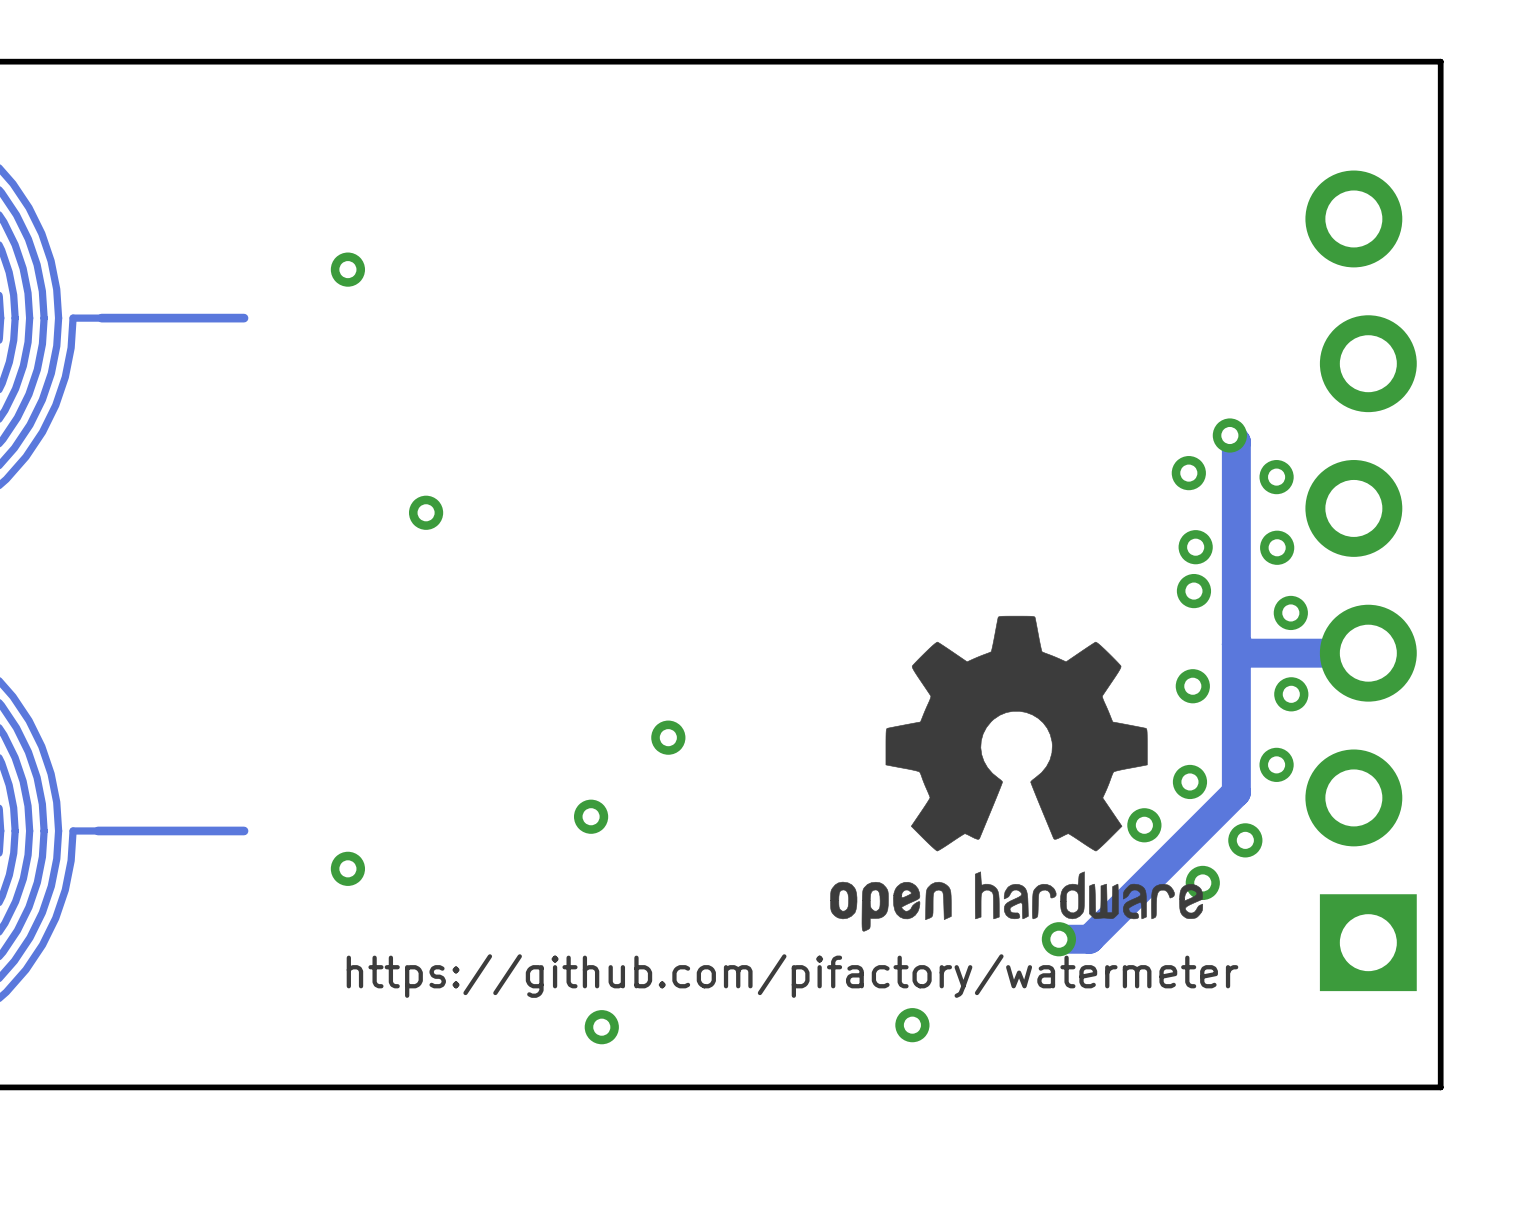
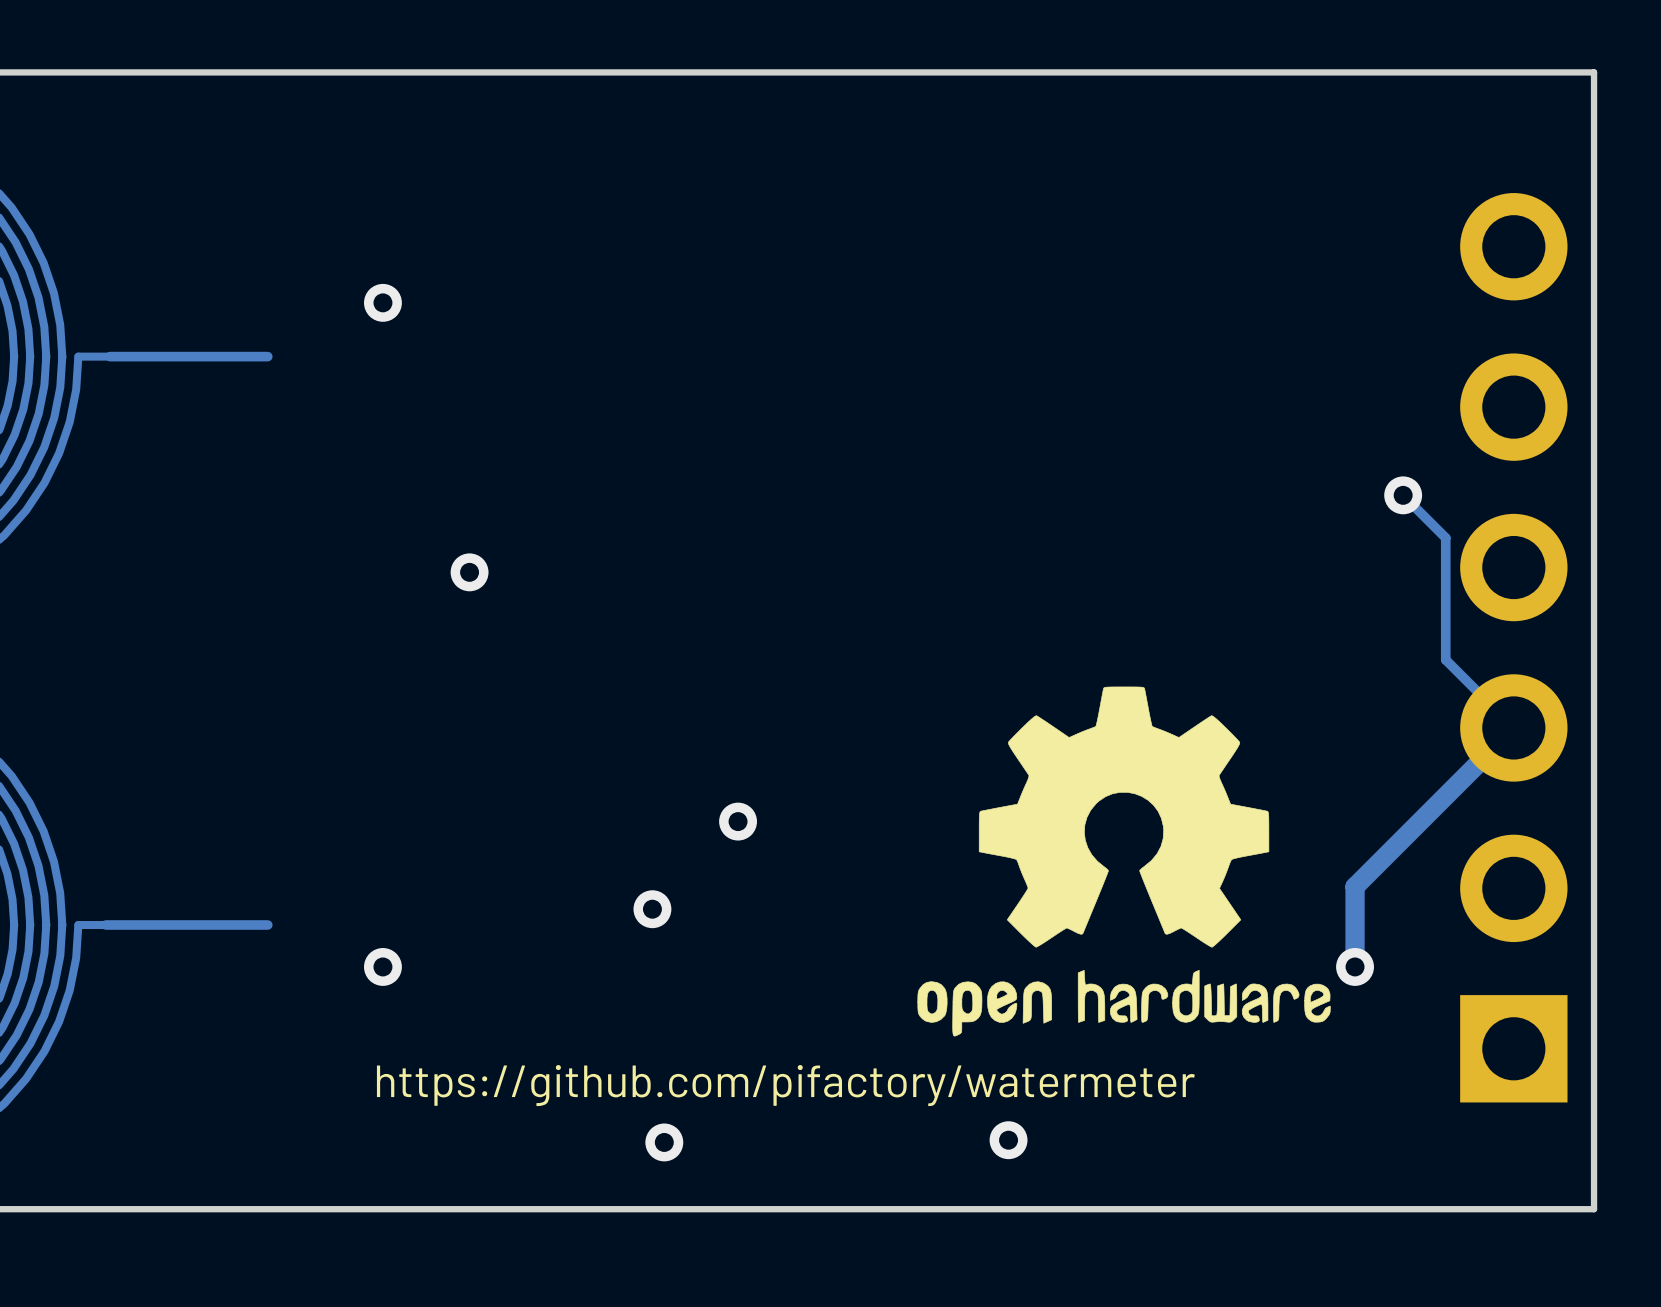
part footprint: [1305, 170, 1417, 992] -> [1460, 193, 1568, 1103]
track: (1229, 435) (1236, 442) (1236, 792) (1089, 939) (1058, 939) -> none
via: (1229, 435) -> none
track: none -> (1403, 495) (1445, 537) (1445, 659) (1513, 727) (1355, 886) (1355, 966)
via: (1188, 473) -> none
via position: (1276, 477) -> (1403, 495)
via: (1195, 547) -> none
via: (1277, 547) -> none
via: (1193, 591) -> none
via: (1290, 612) -> none
track: (1236, 644) (1245, 653) (1368, 653) -> none
via: (1192, 686) -> none
via: (1291, 694) -> none
via: (1276, 764) -> none
via: (1189, 781) -> none
via: (1144, 825) -> none
via: (1245, 840) -> none
via: none -> (1355, 966)
via: (1202, 882) -> none
via: (1058, 939) -> none

